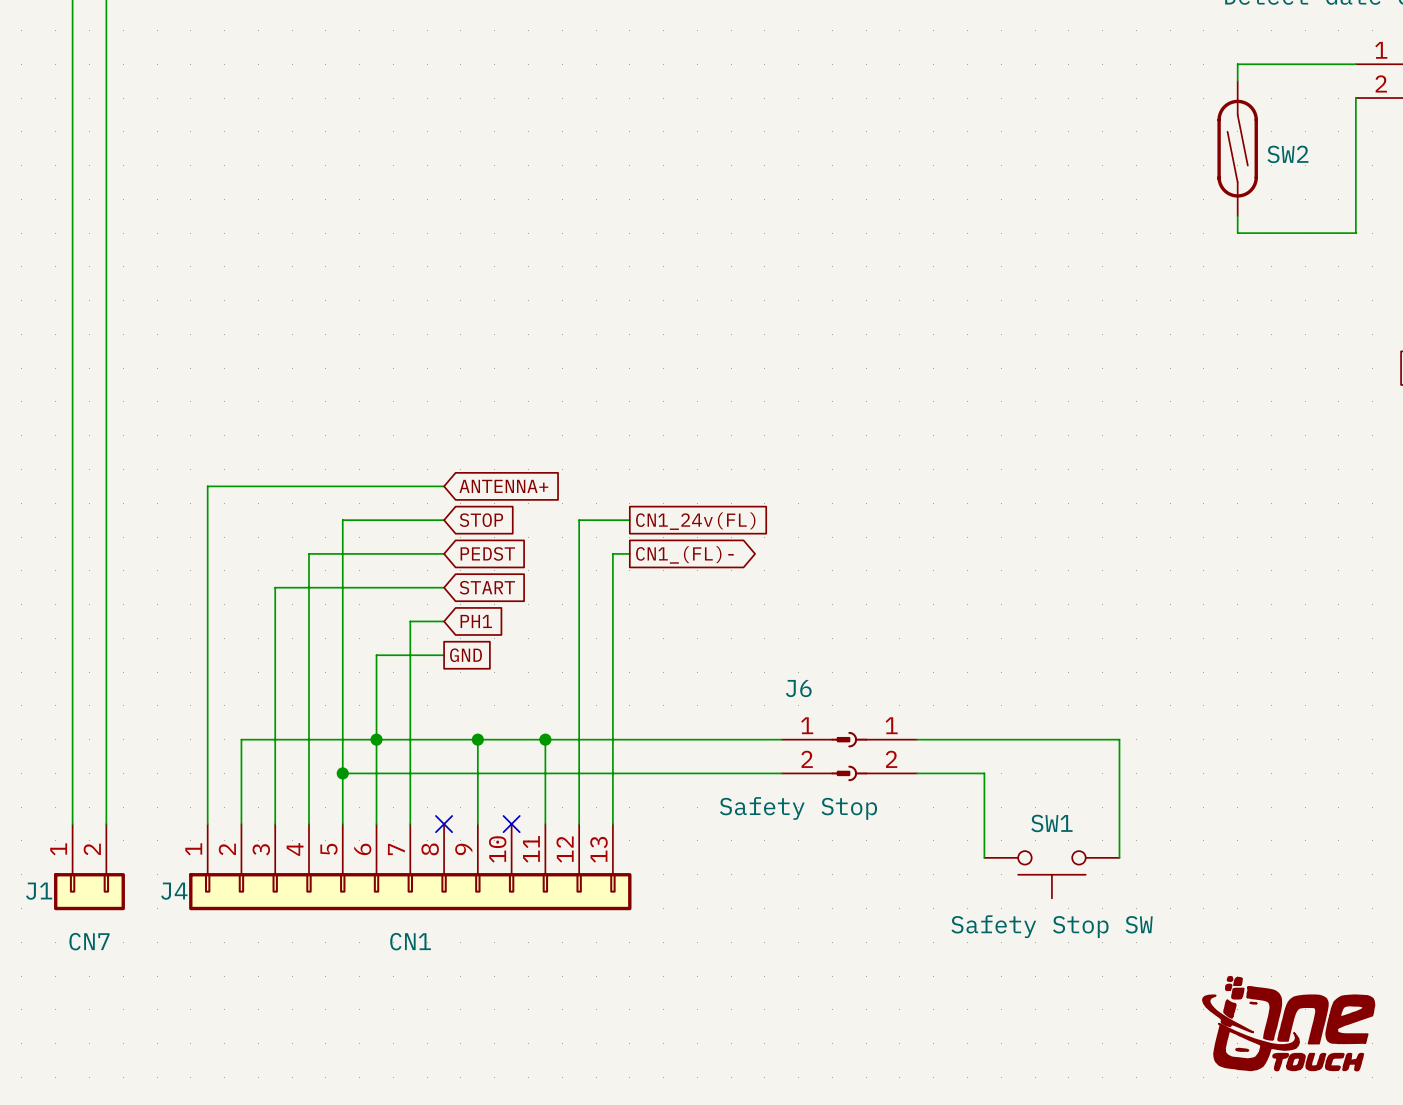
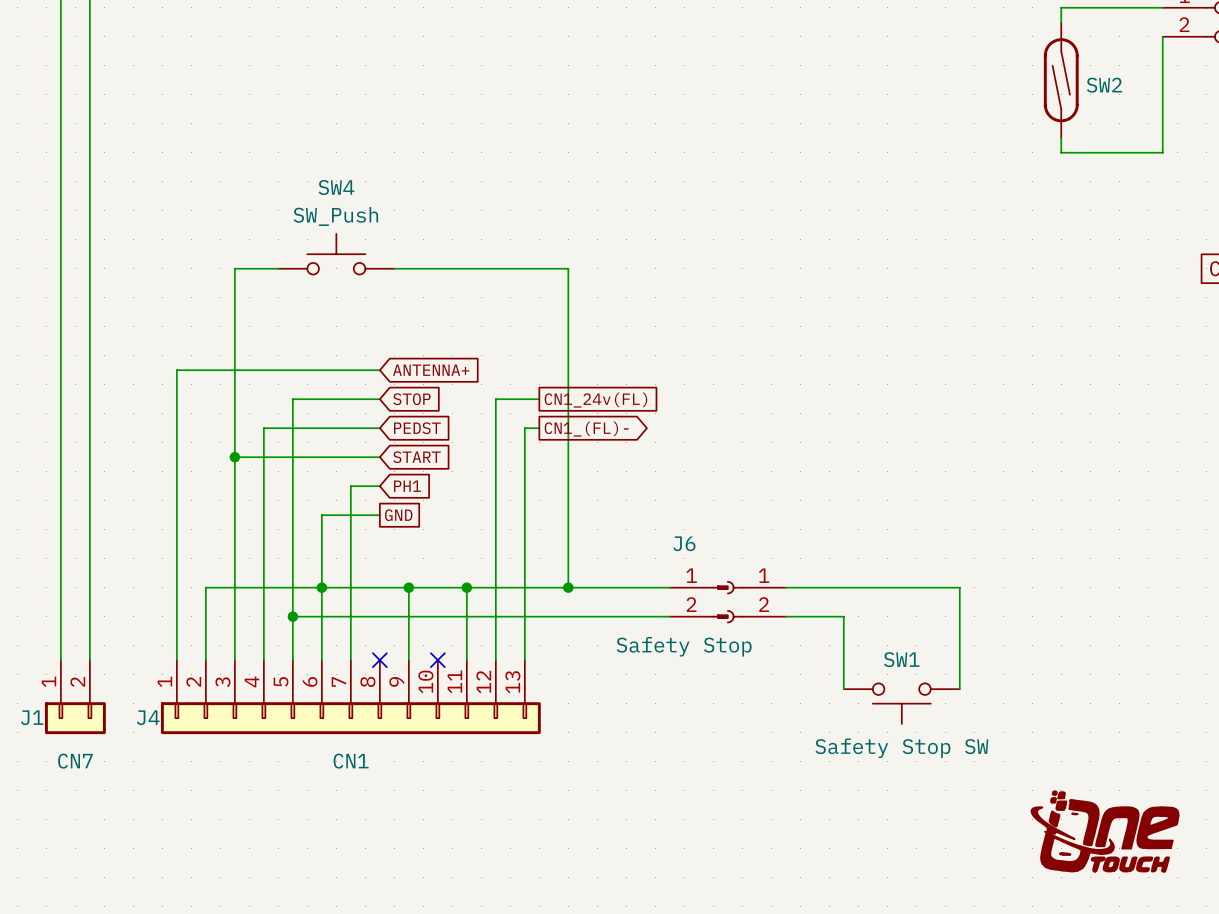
SW4: none -> SW_Push (336, 254)
wire: none -> (278, 268) (234, 268) (234, 457)
wire: none -> (394, 268) (568, 268) (568, 587)
junction: none -> (234, 457)
junction: none -> (568, 587)

